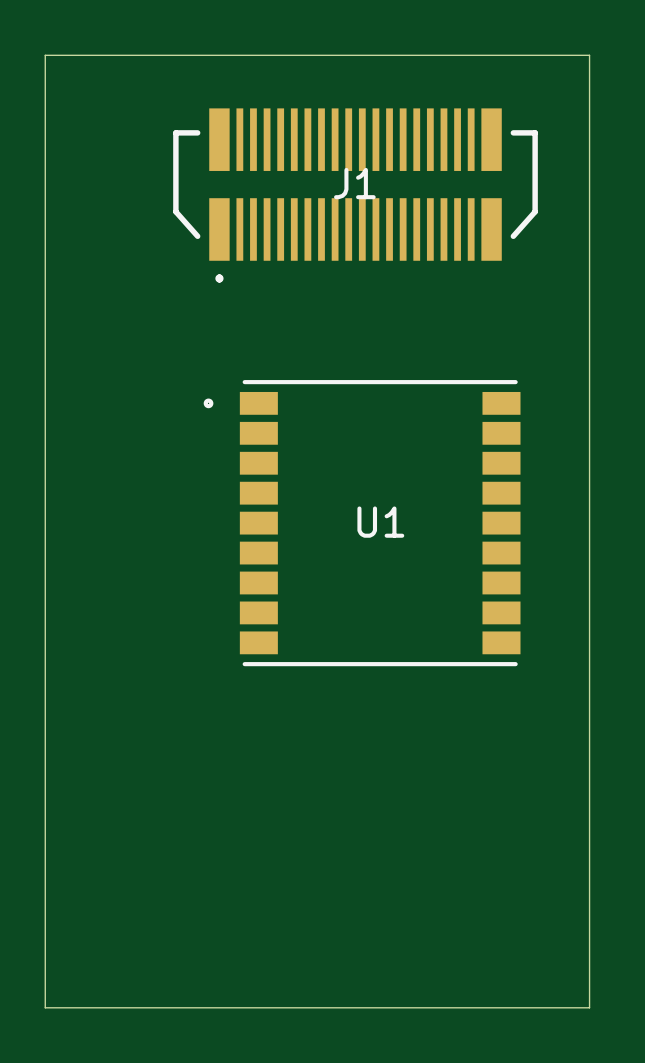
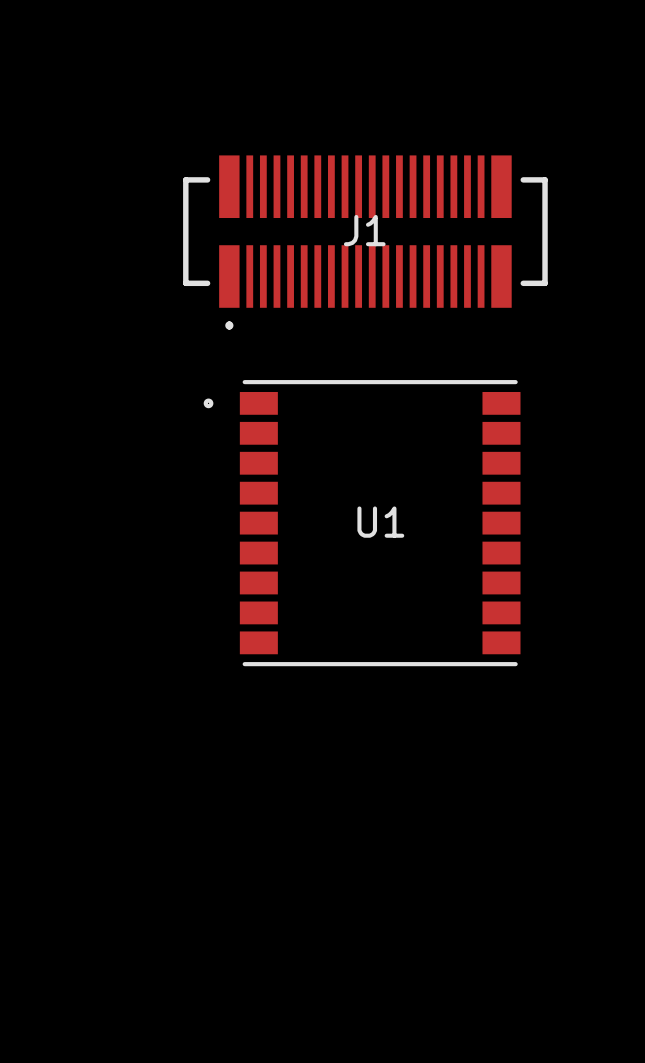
board edge: (45, 55) (589, 55) (589, 1007) (45, 1007) (45, 55) -> none
J1 footprint: [173, 108, 538, 283] -> [183, 155, 548, 330]

